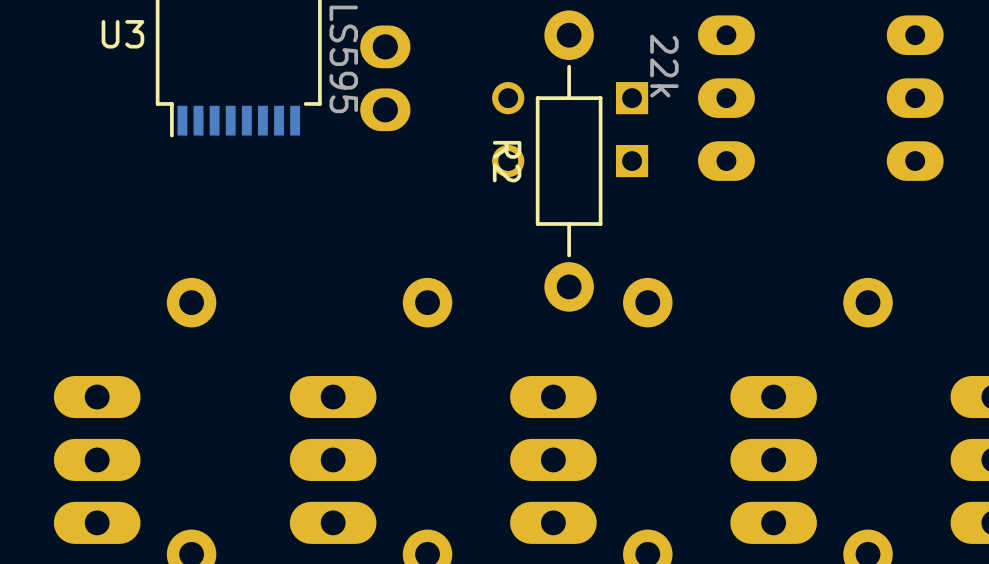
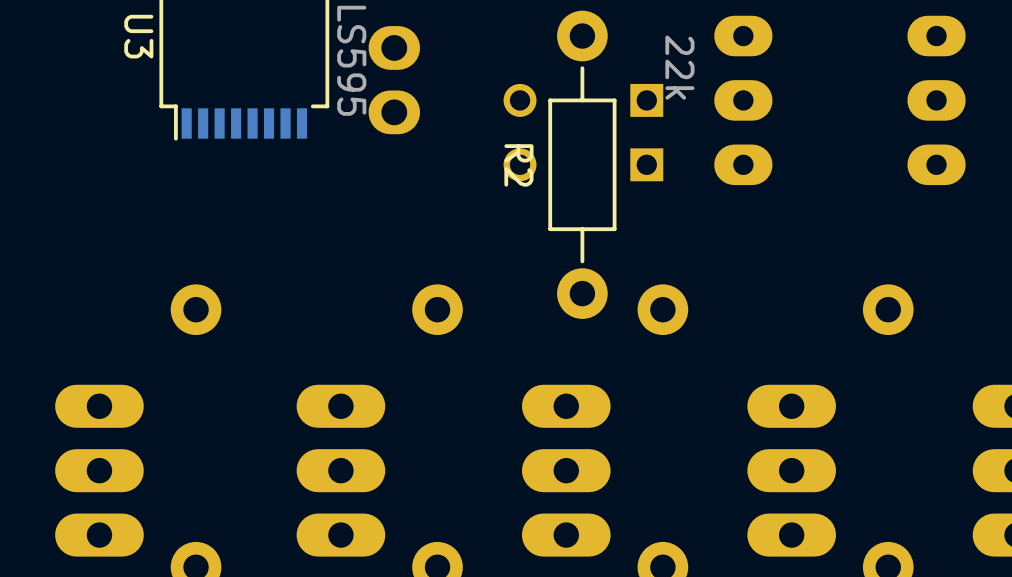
U3 name rotation: 0° (122, 34) -> 90° clockwise (138, 36)

